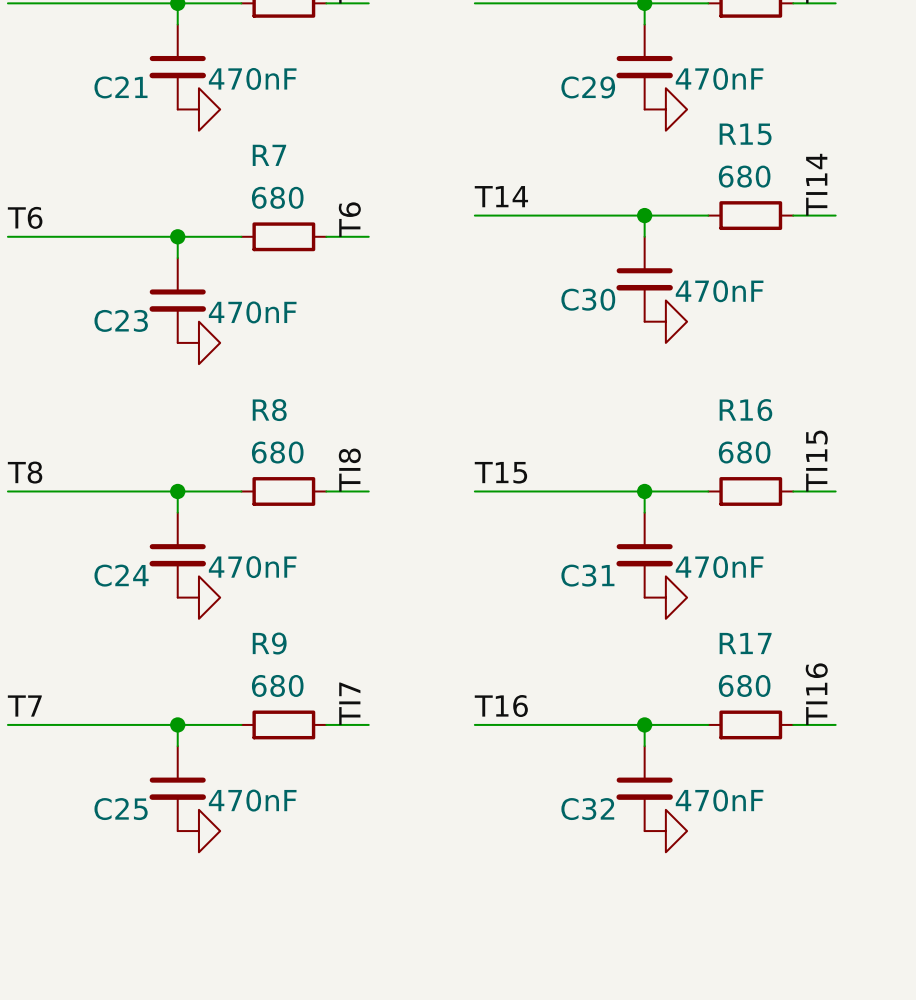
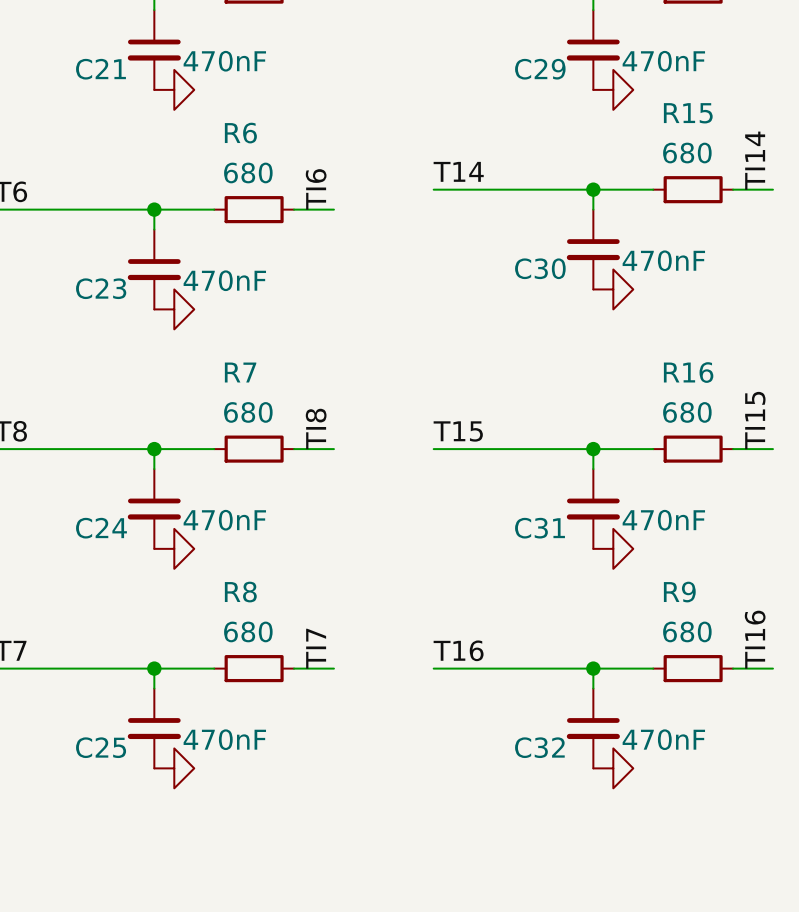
R7 name: R7 (269, 155) -> R6 (240, 133)
label: T6 (349, 219) -> TI6 (316, 189)
R8 name: R8 (269, 410) -> R7 (240, 372)
R9 name: R9 (269, 643) -> R8 (240, 592)
R17 name: R17 (745, 643) -> R9 (679, 592)

